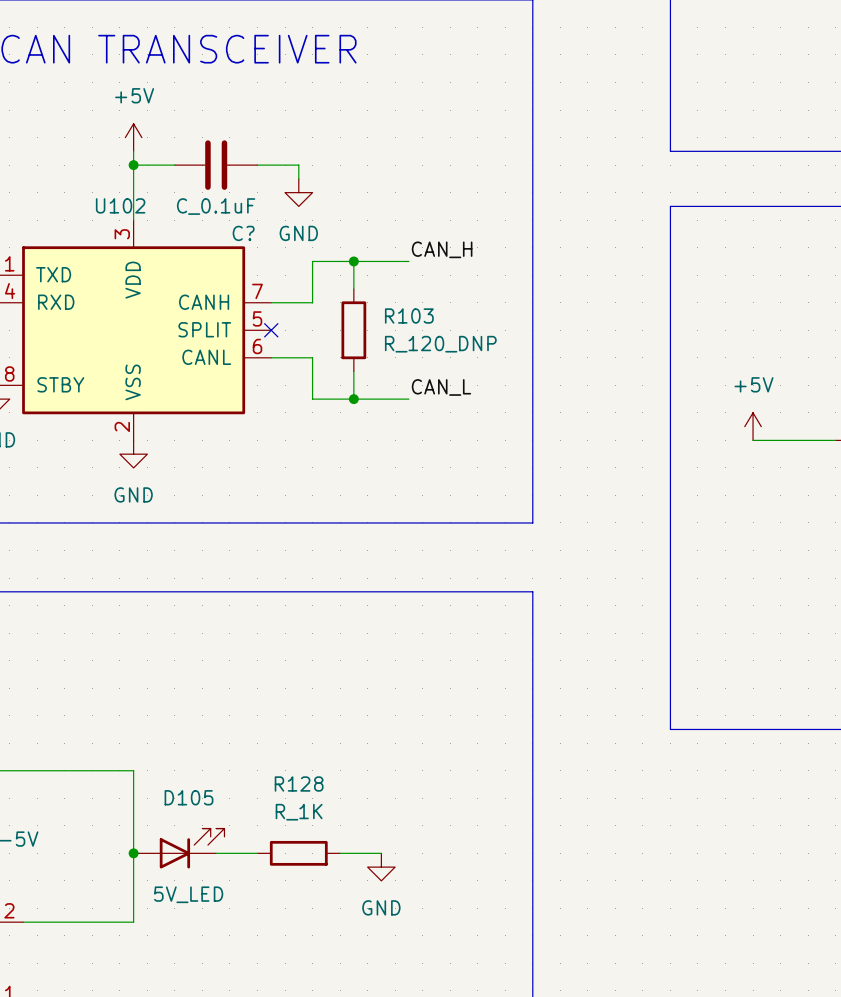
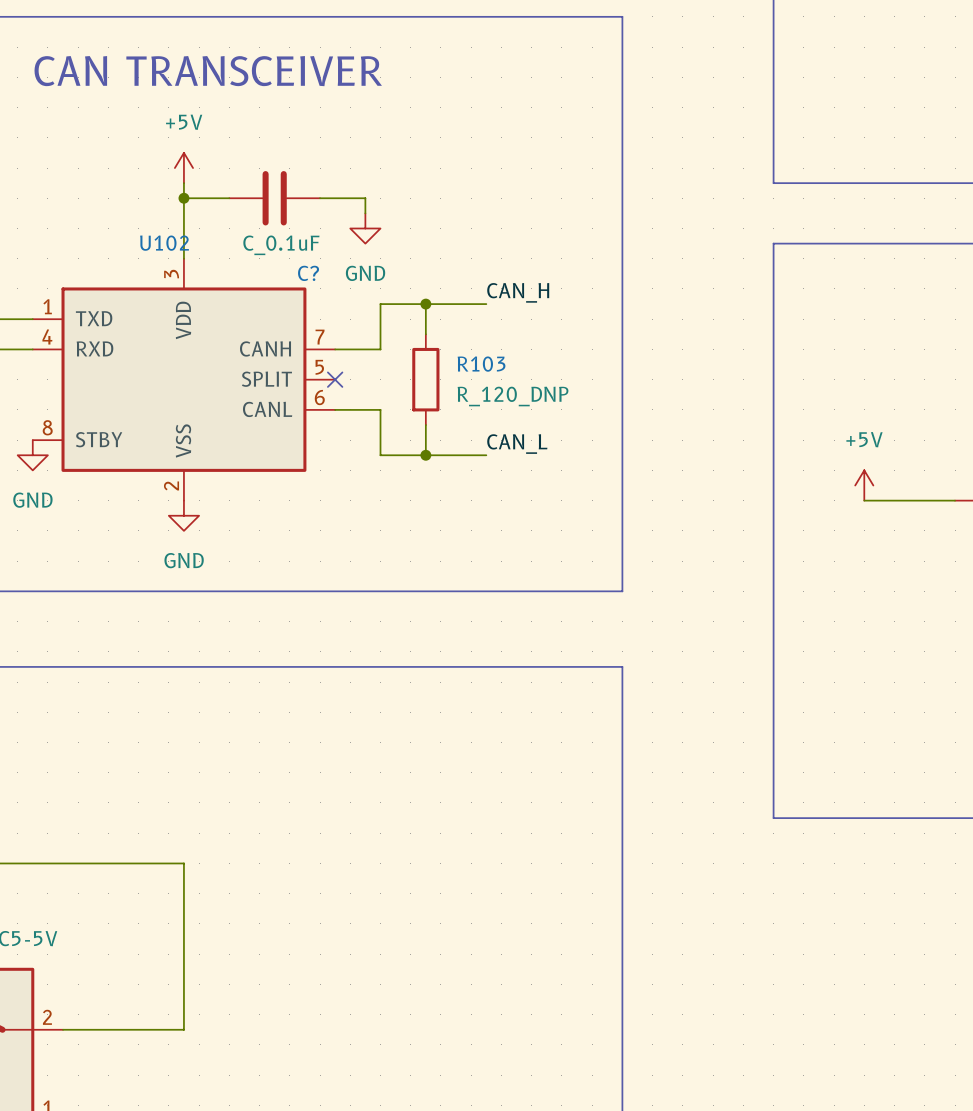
D105: 5V_LED (179, 848) -> none
junction: (133, 853) -> none
wire: (216, 853) (257, 853) -> none
R128: R_1K (298, 853) -> none
wire: (340, 853) (381, 853) -> none
power symbol: GND (381, 867) -> none

